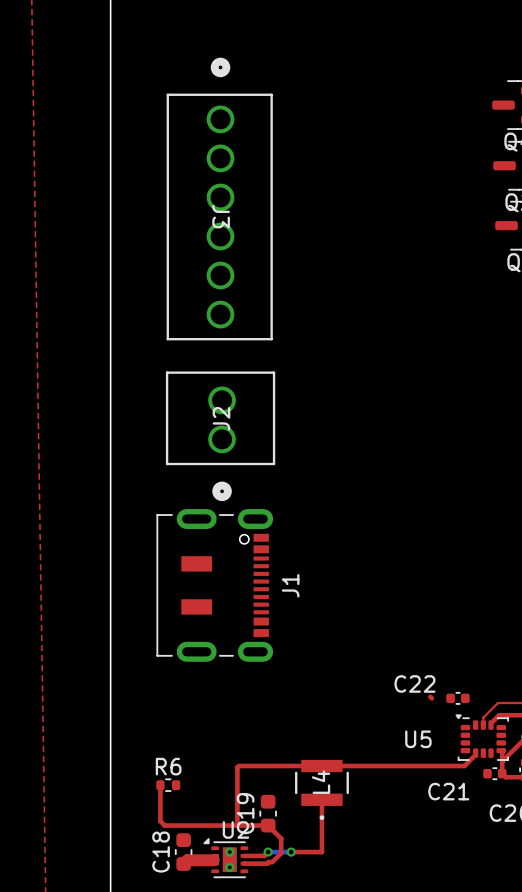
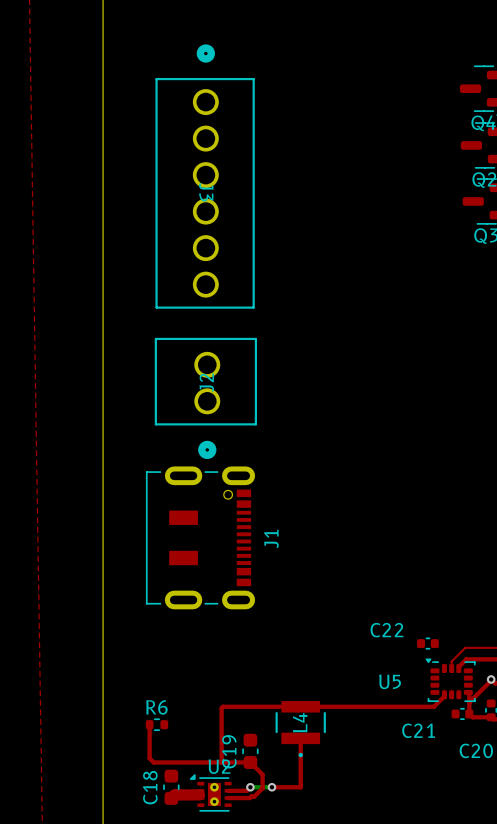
top track: (430, 696) (431, 698) -> none

